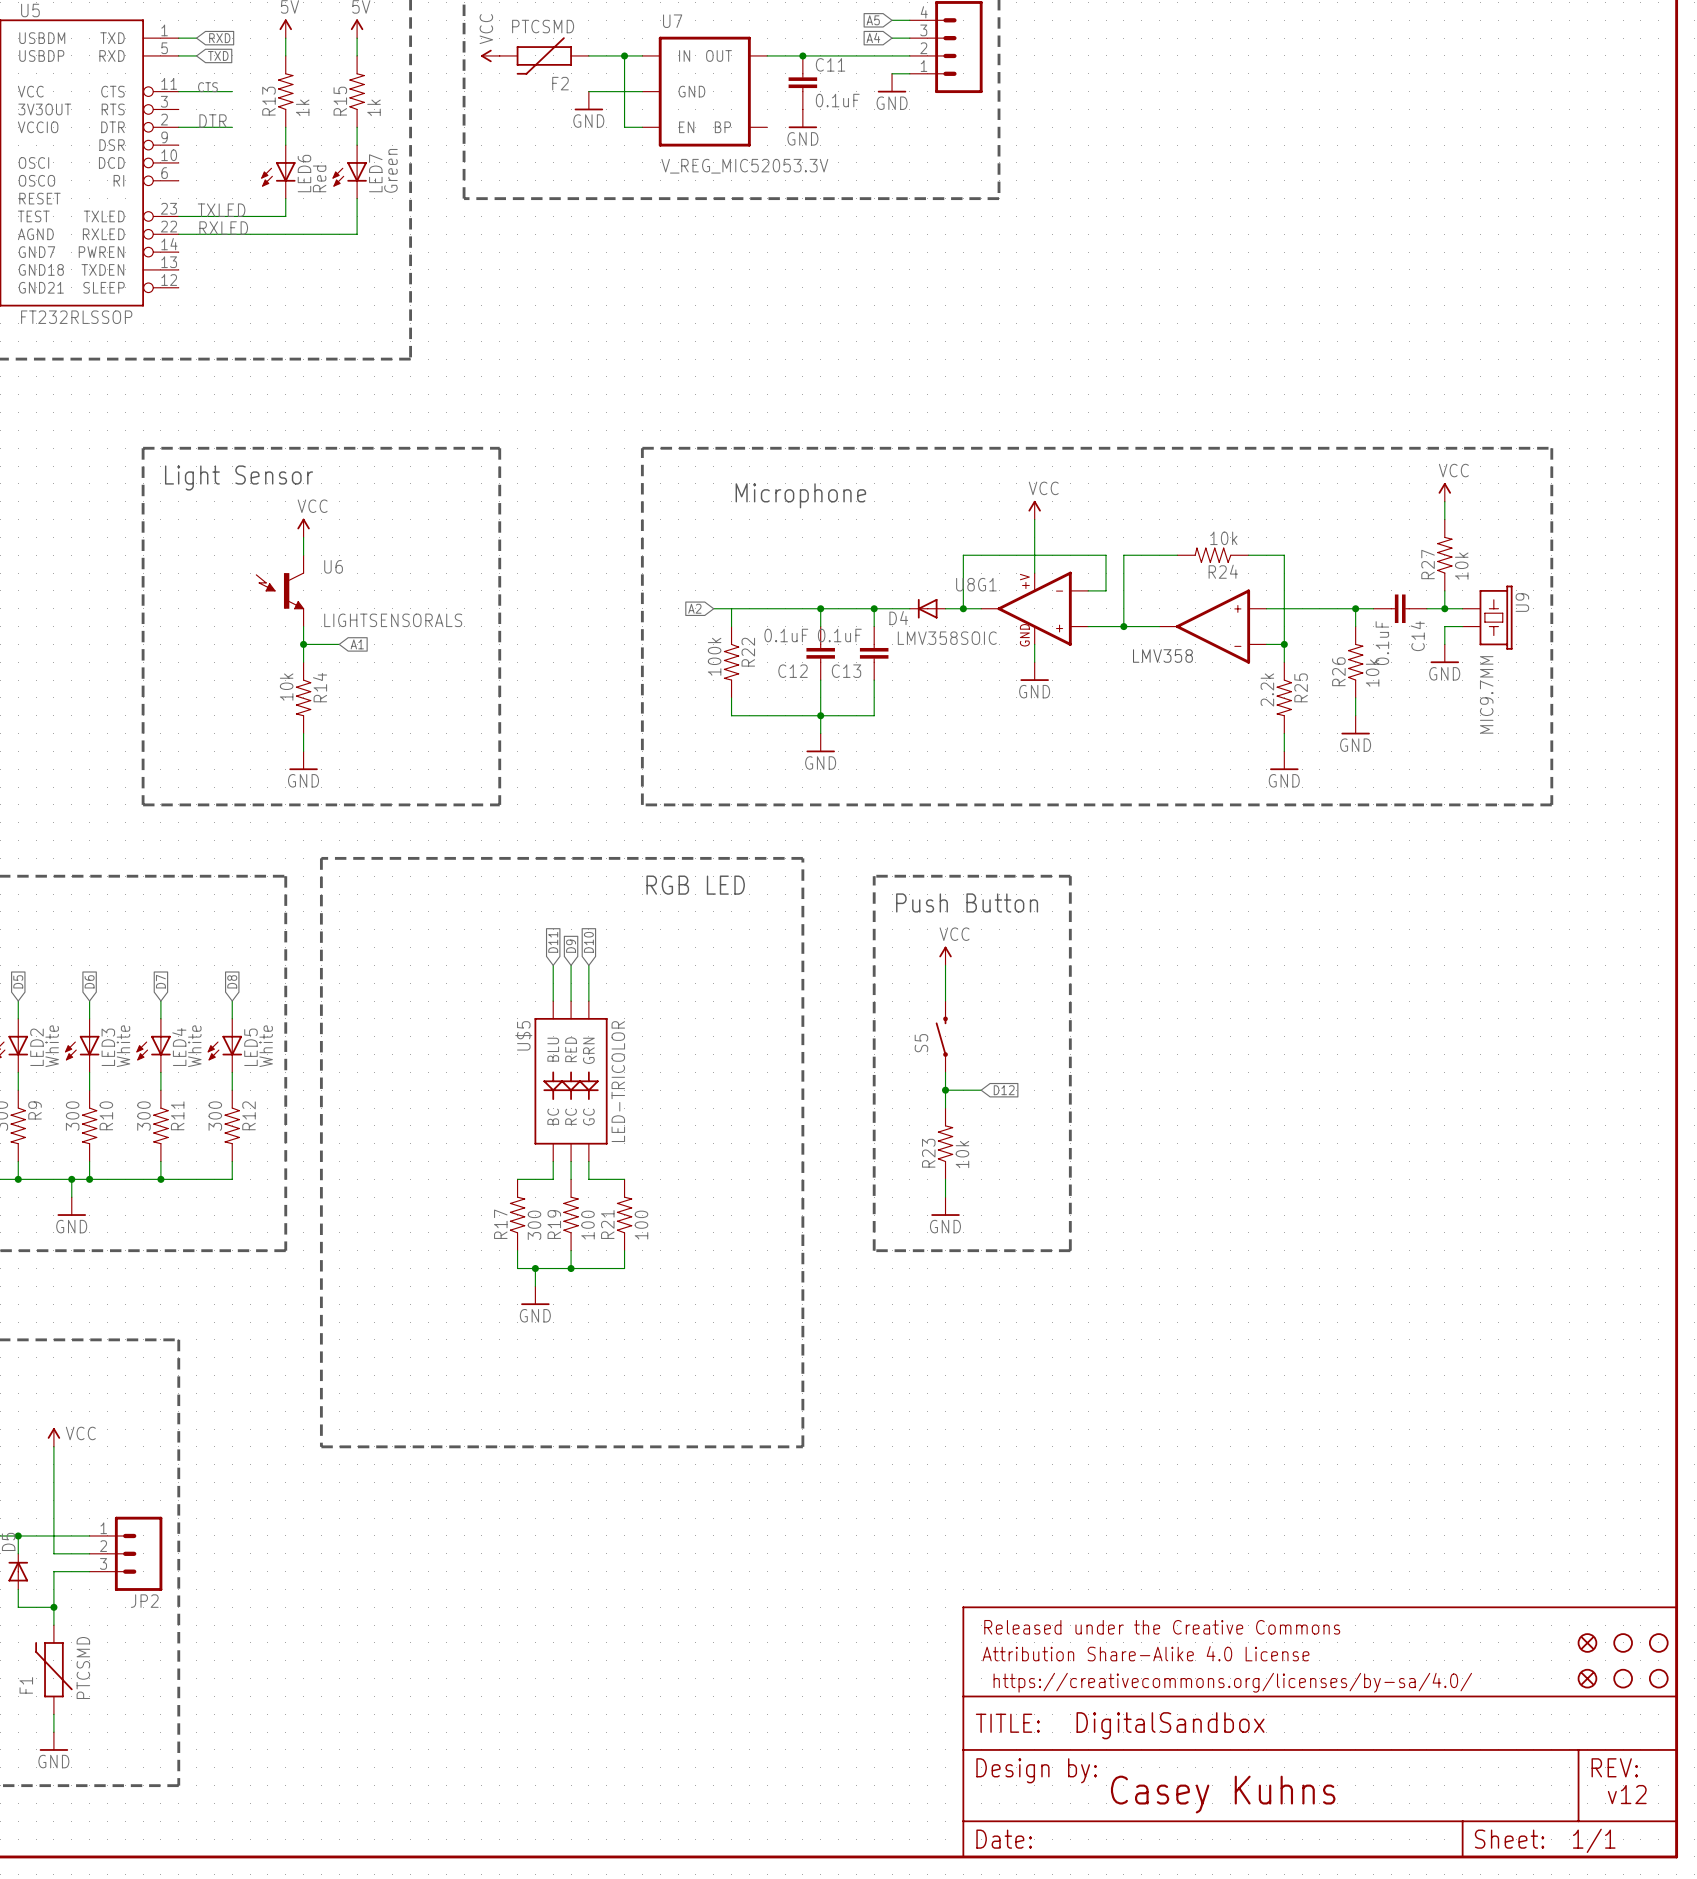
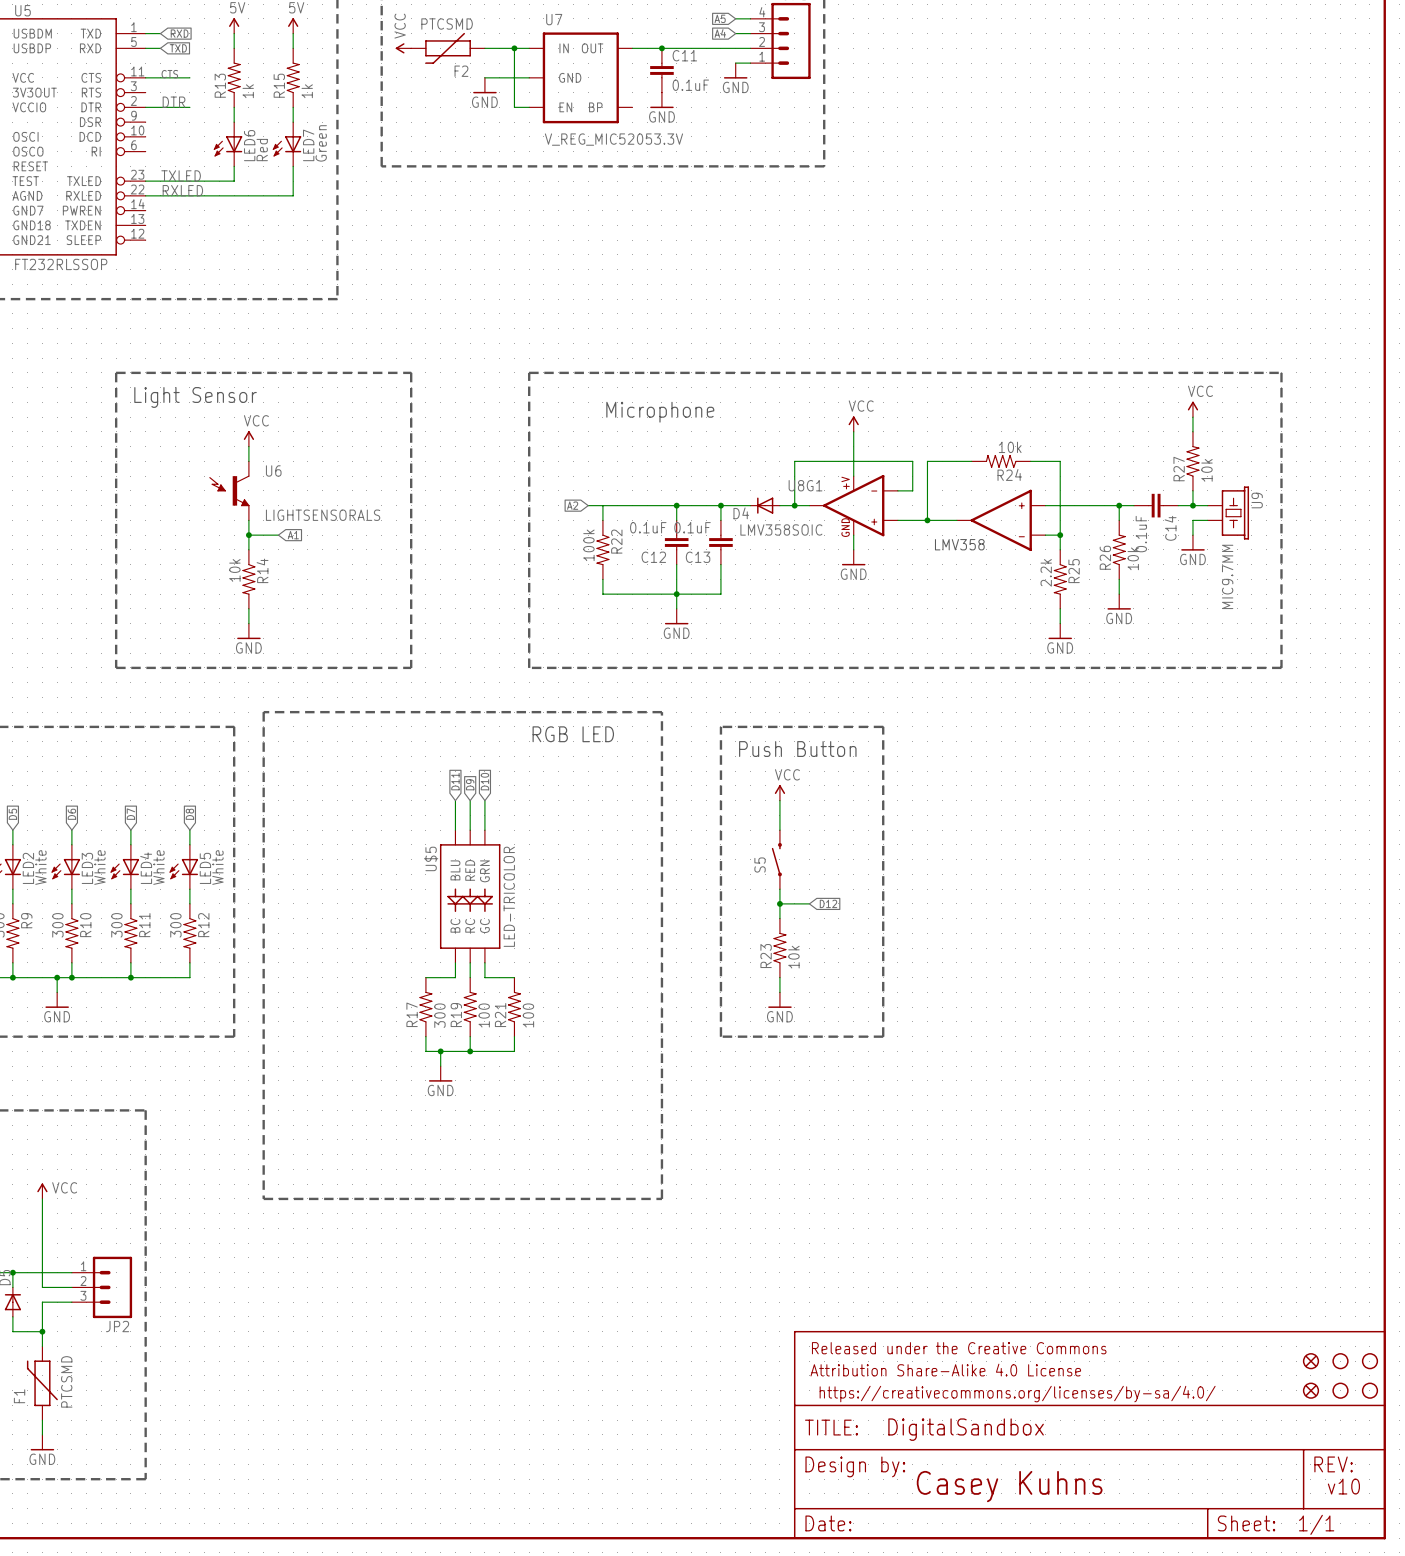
text: v12 (1627, 1794) -> v10 (1343, 1486)

